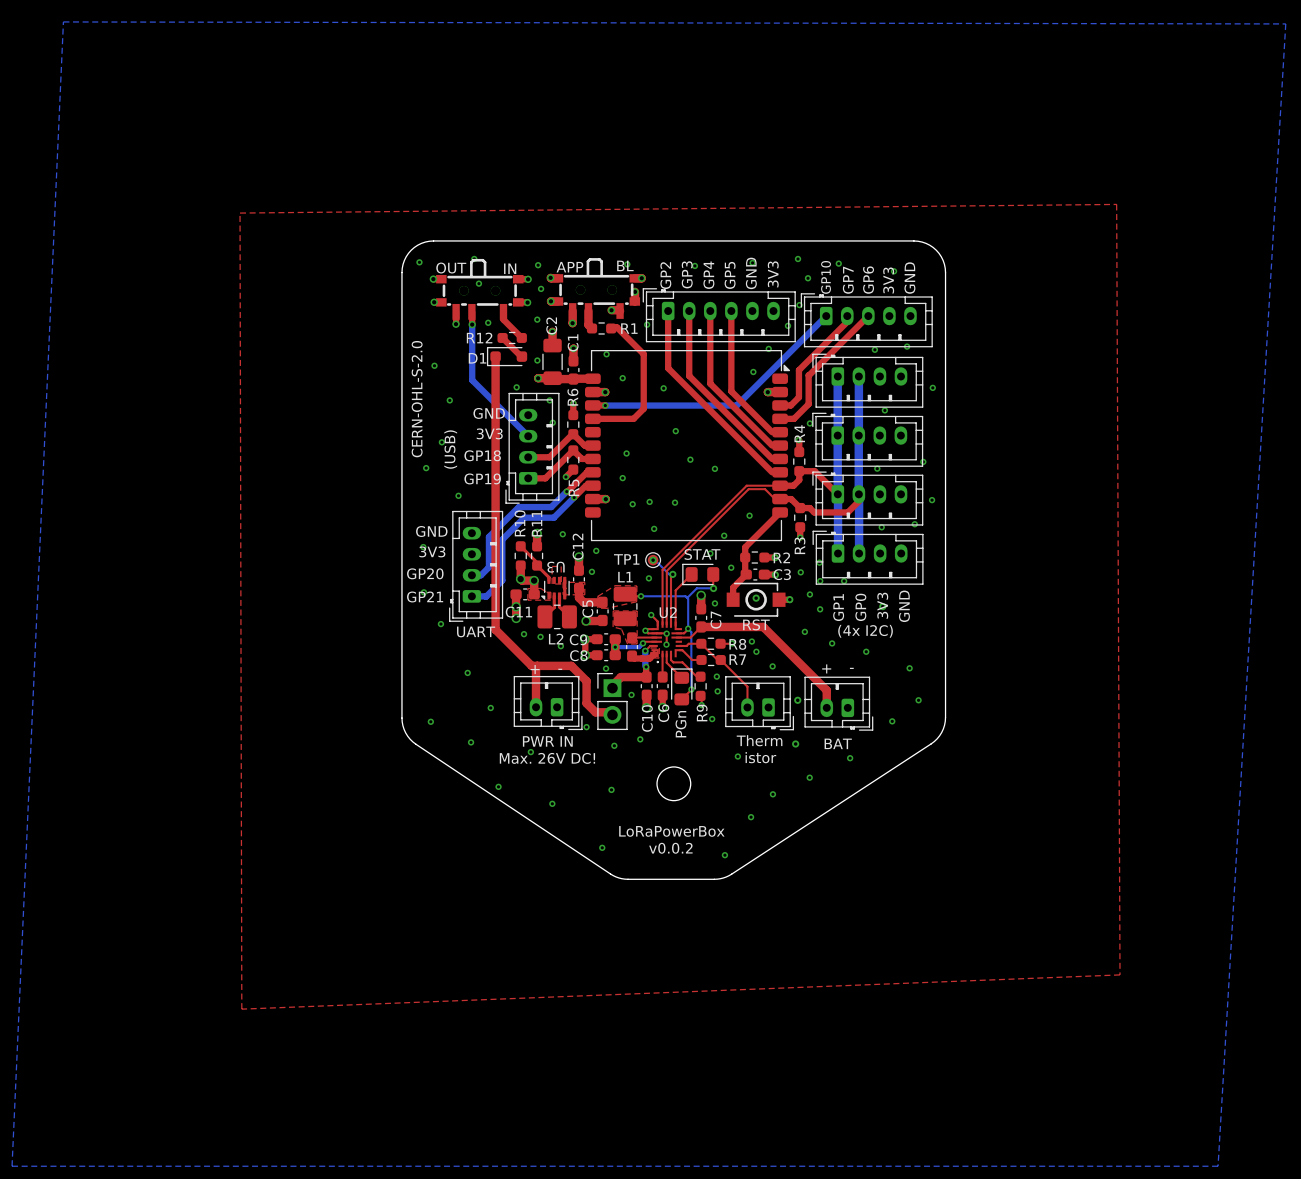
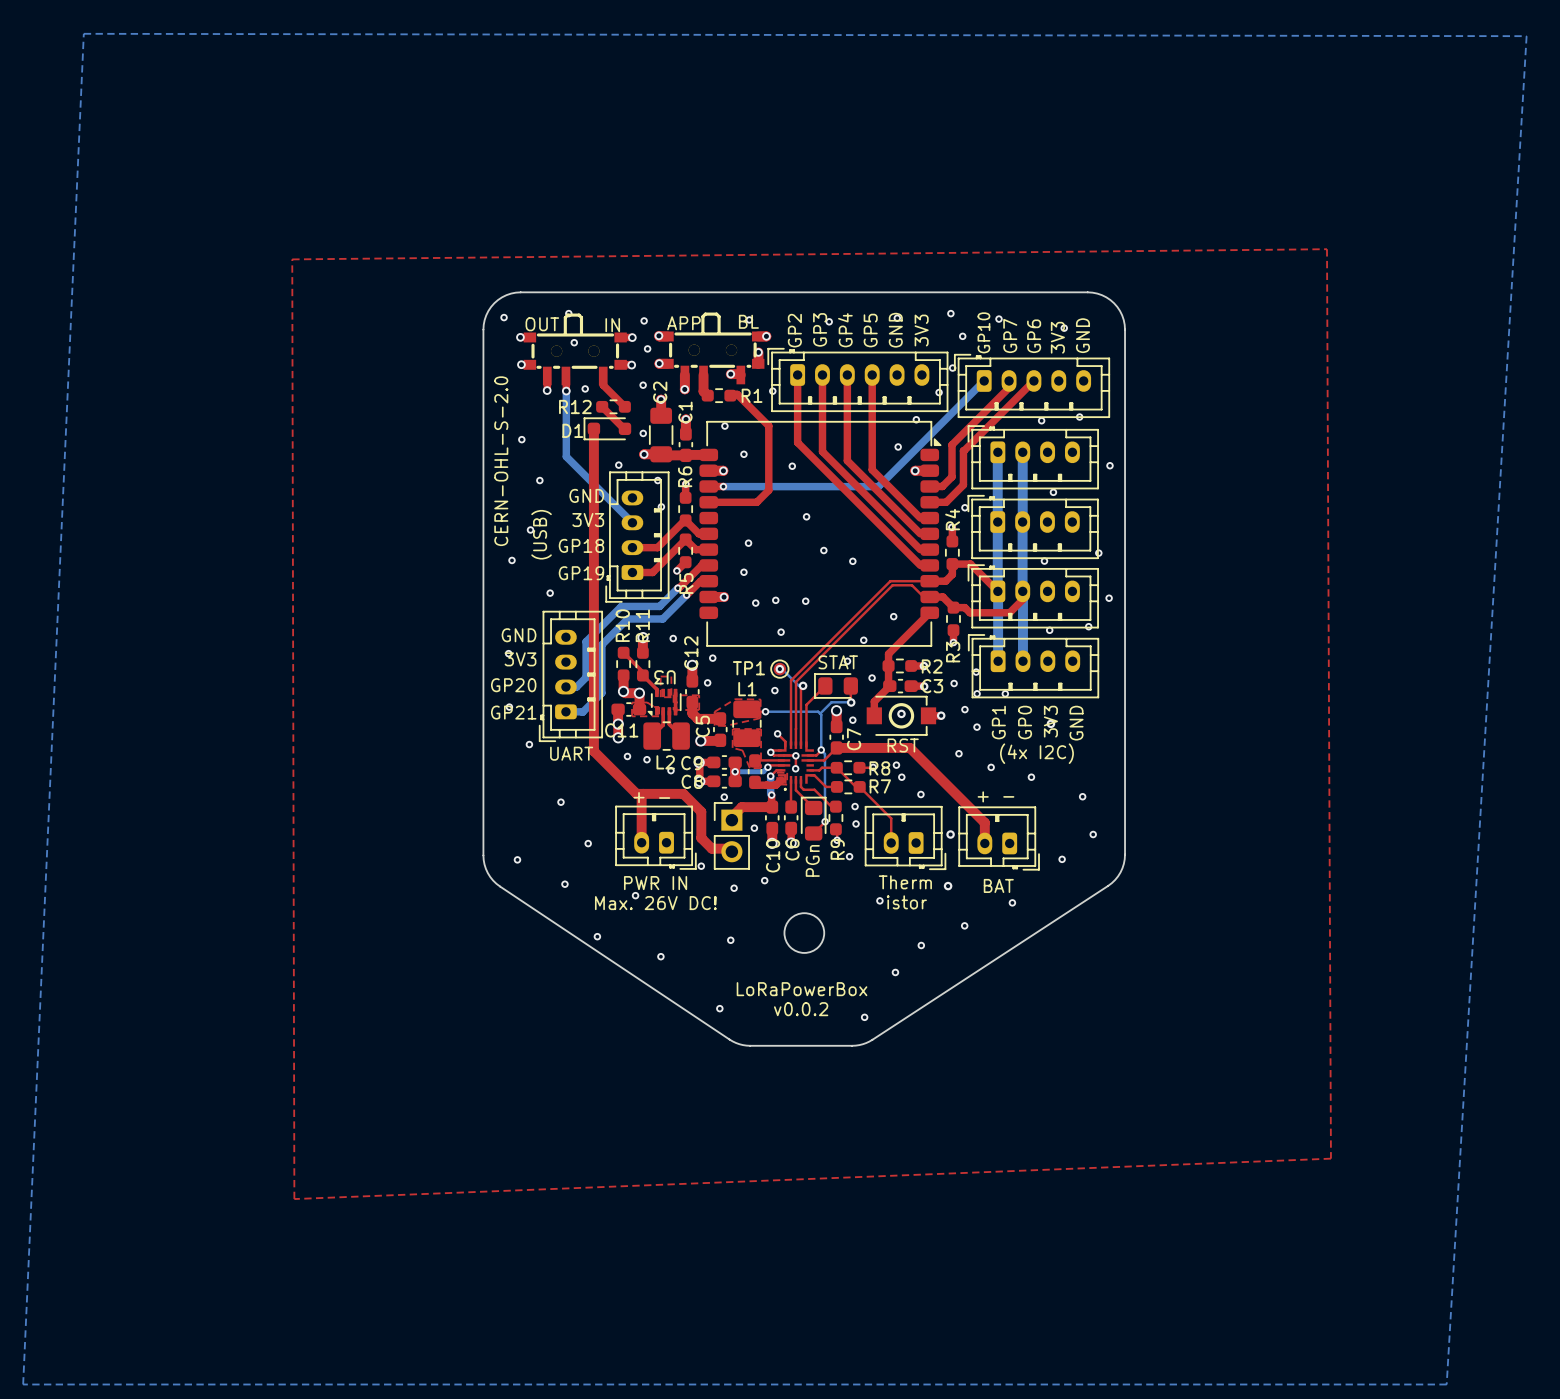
U2 name: U2 (668, 612) -> none

